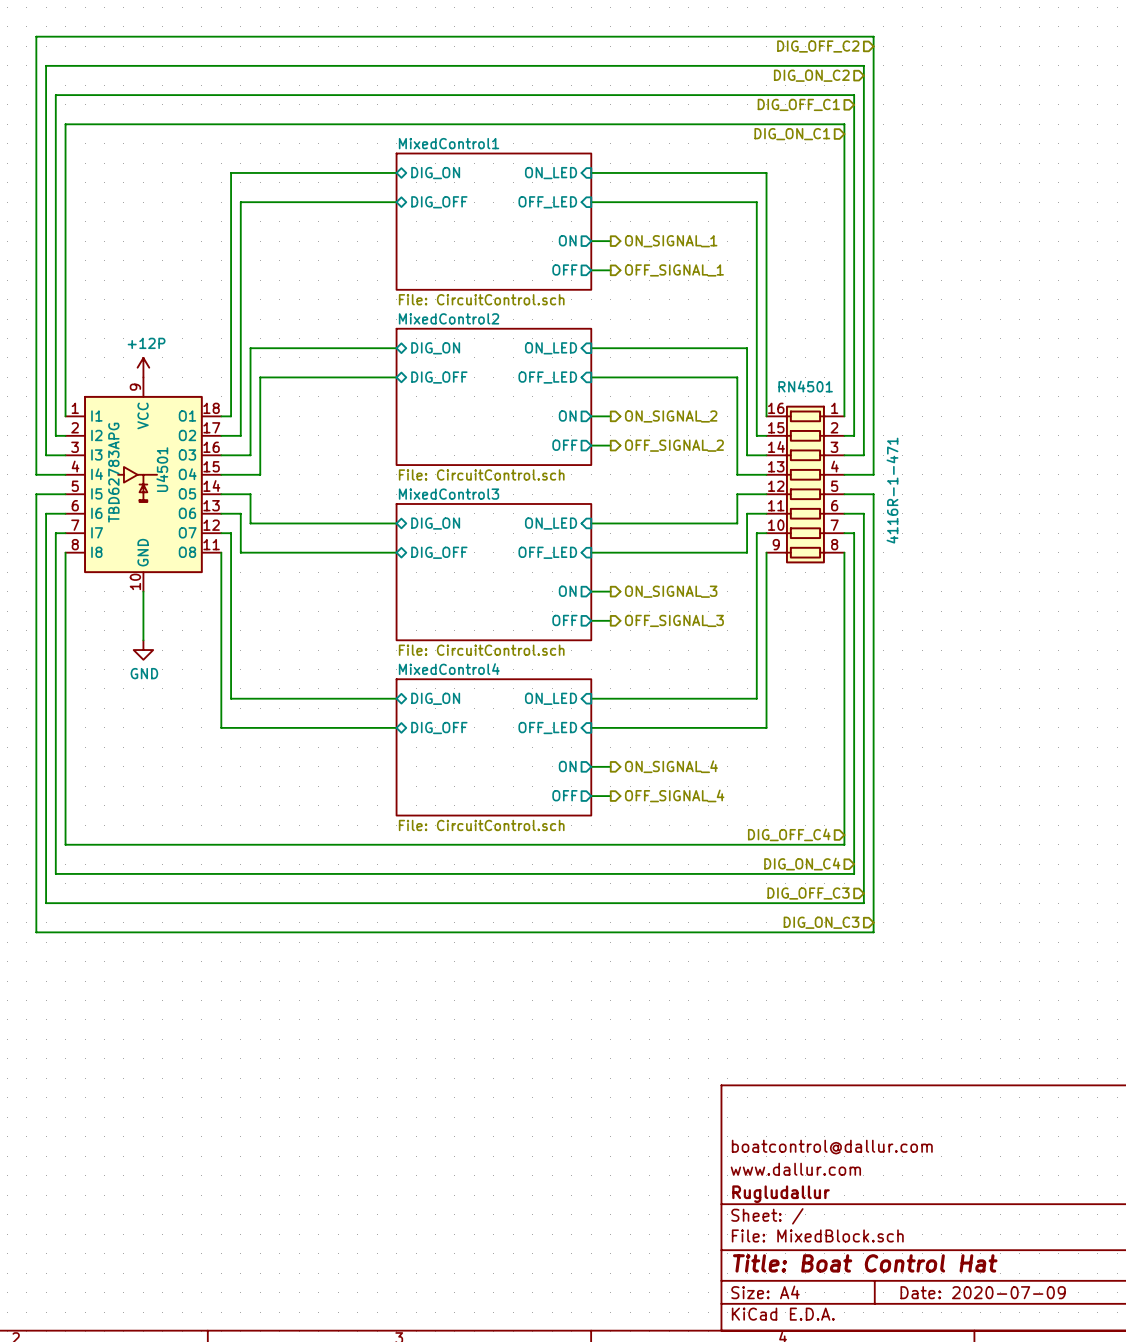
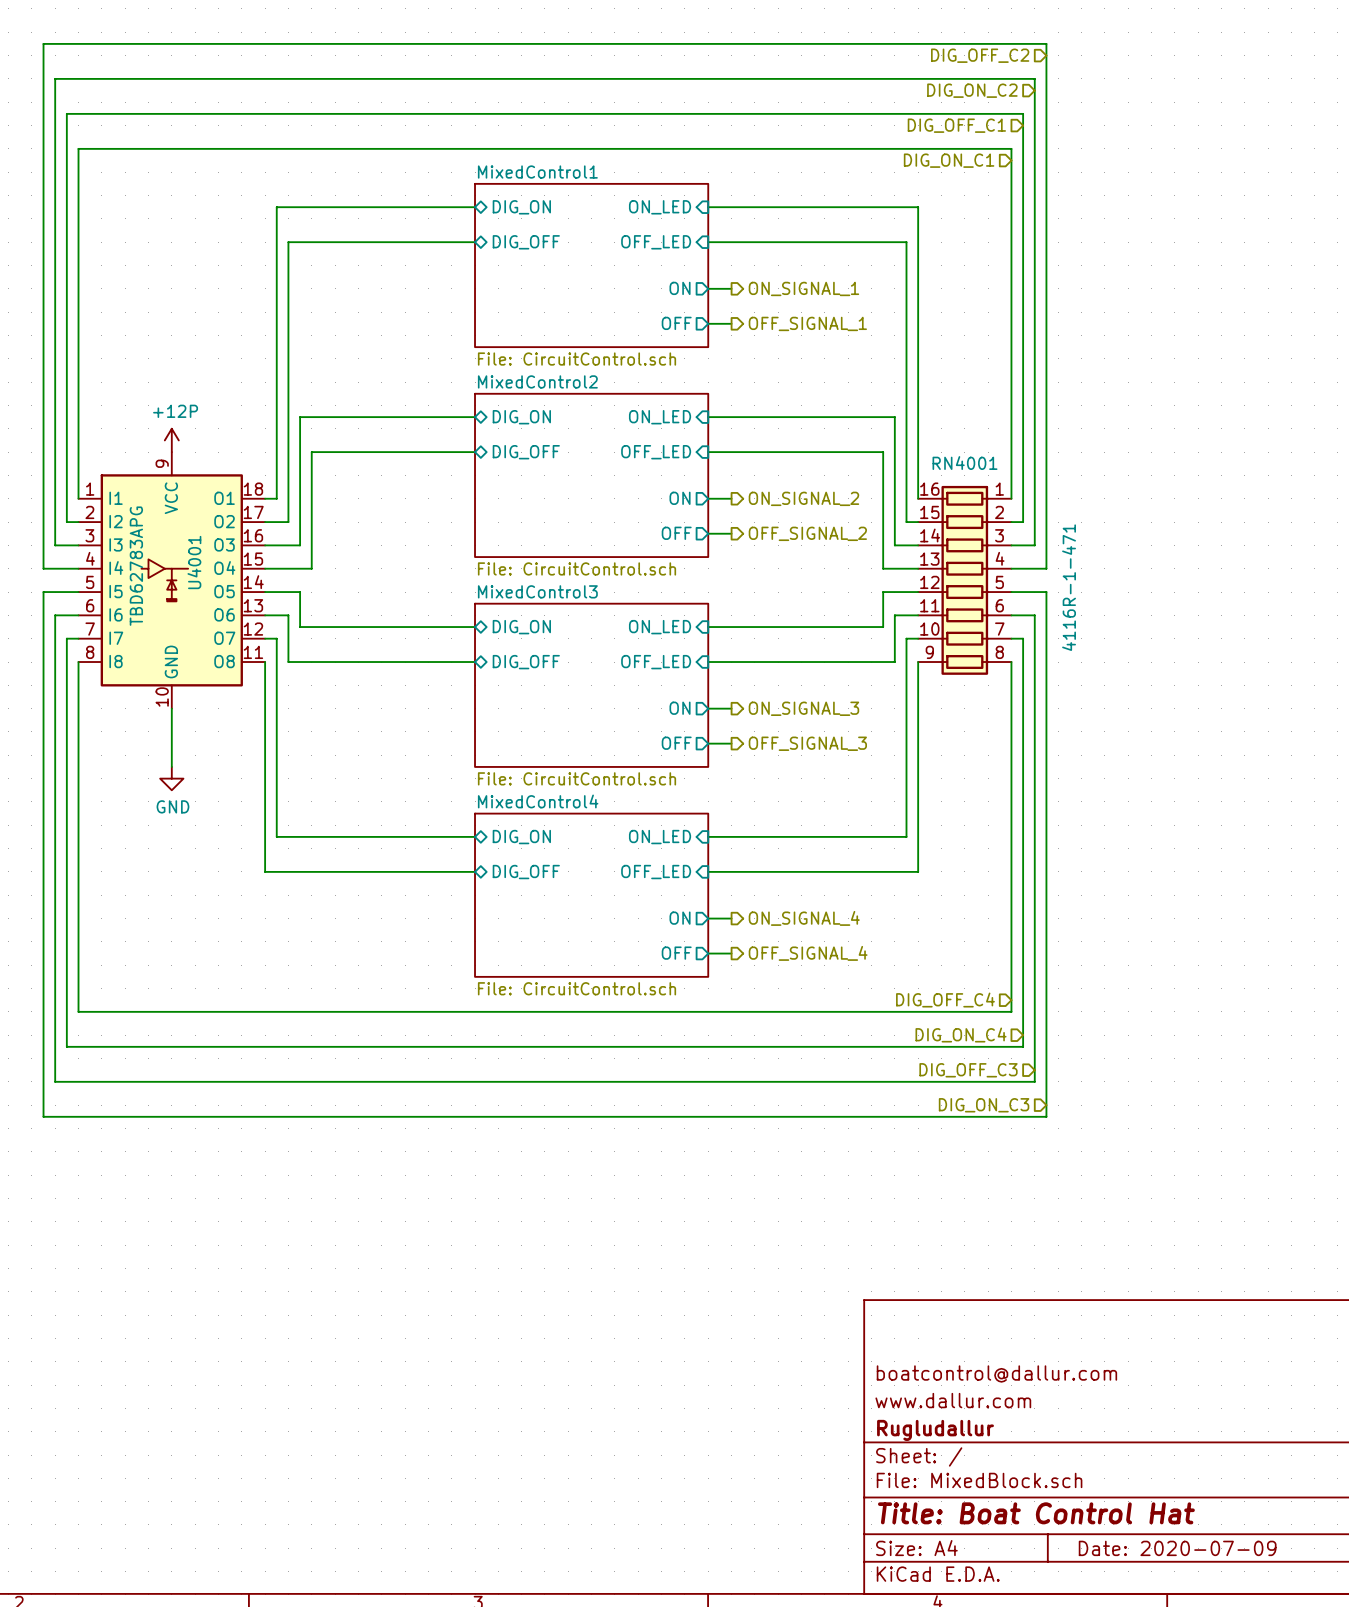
RN4501 name: RN4501 (805, 386) -> RN4001 (964, 463)
U4501 name: U4501 (162, 469) -> U4001 (194, 562)

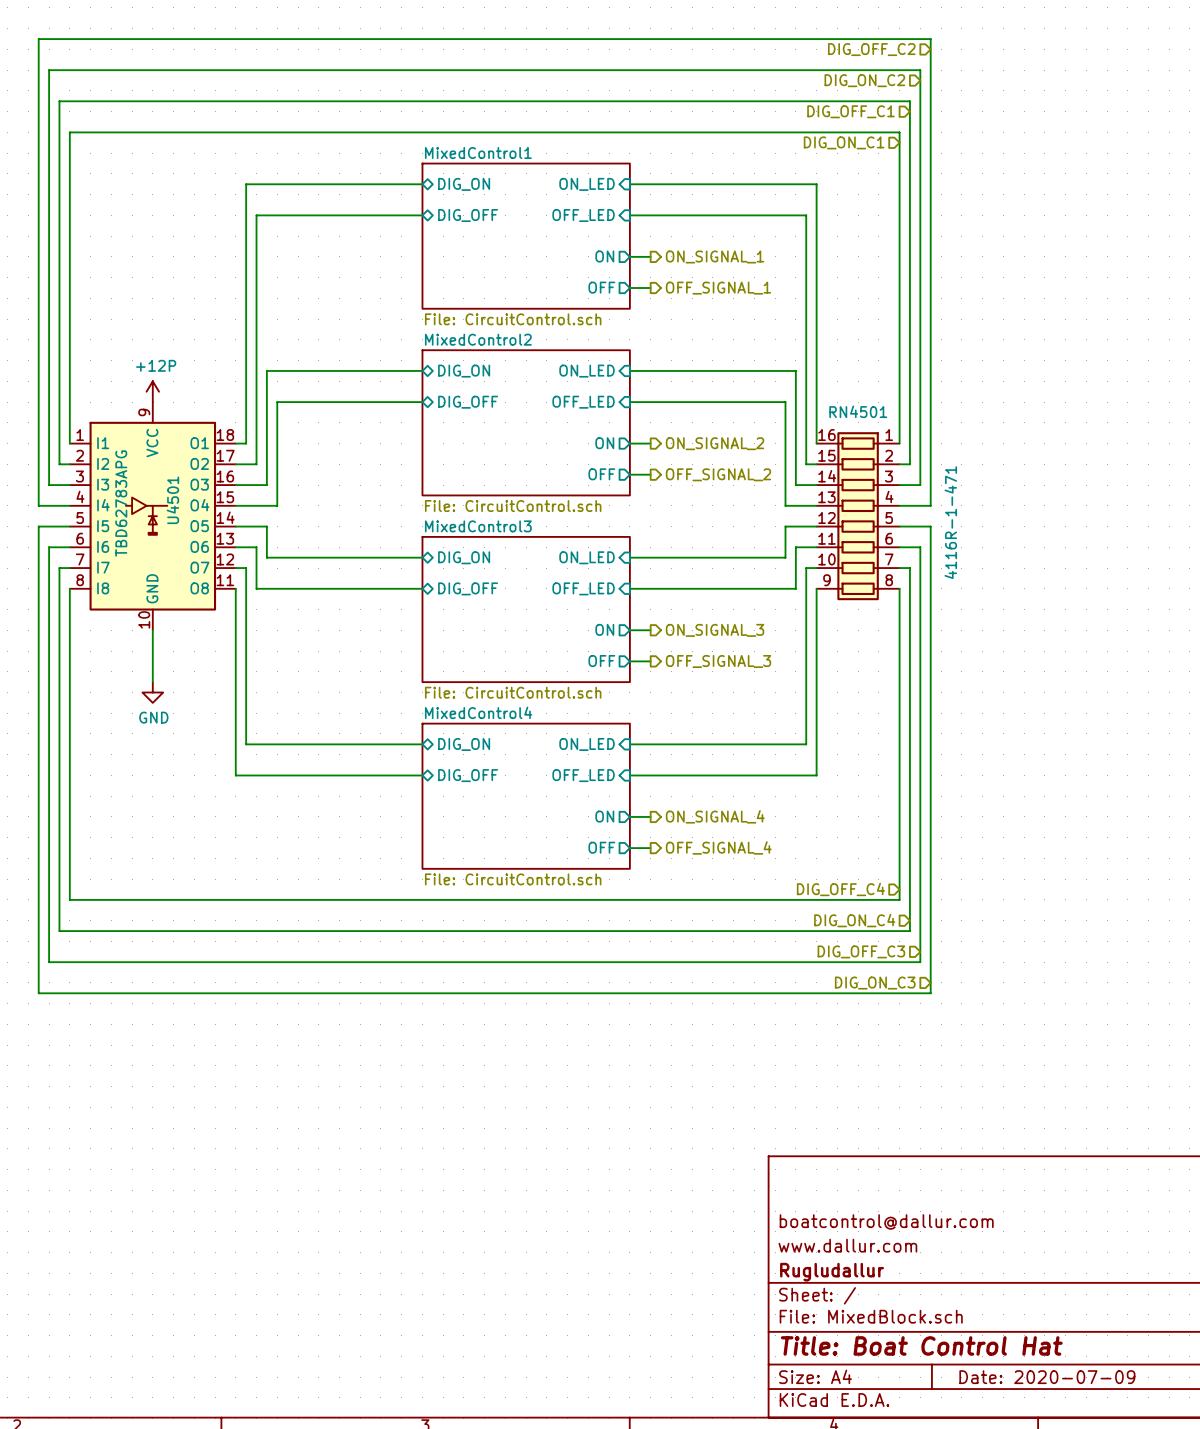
RN4001 name: RN4001 (964, 463) -> RN4501 (858, 411)
U4001 name: U4001 (194, 562) -> U4501 (172, 500)

